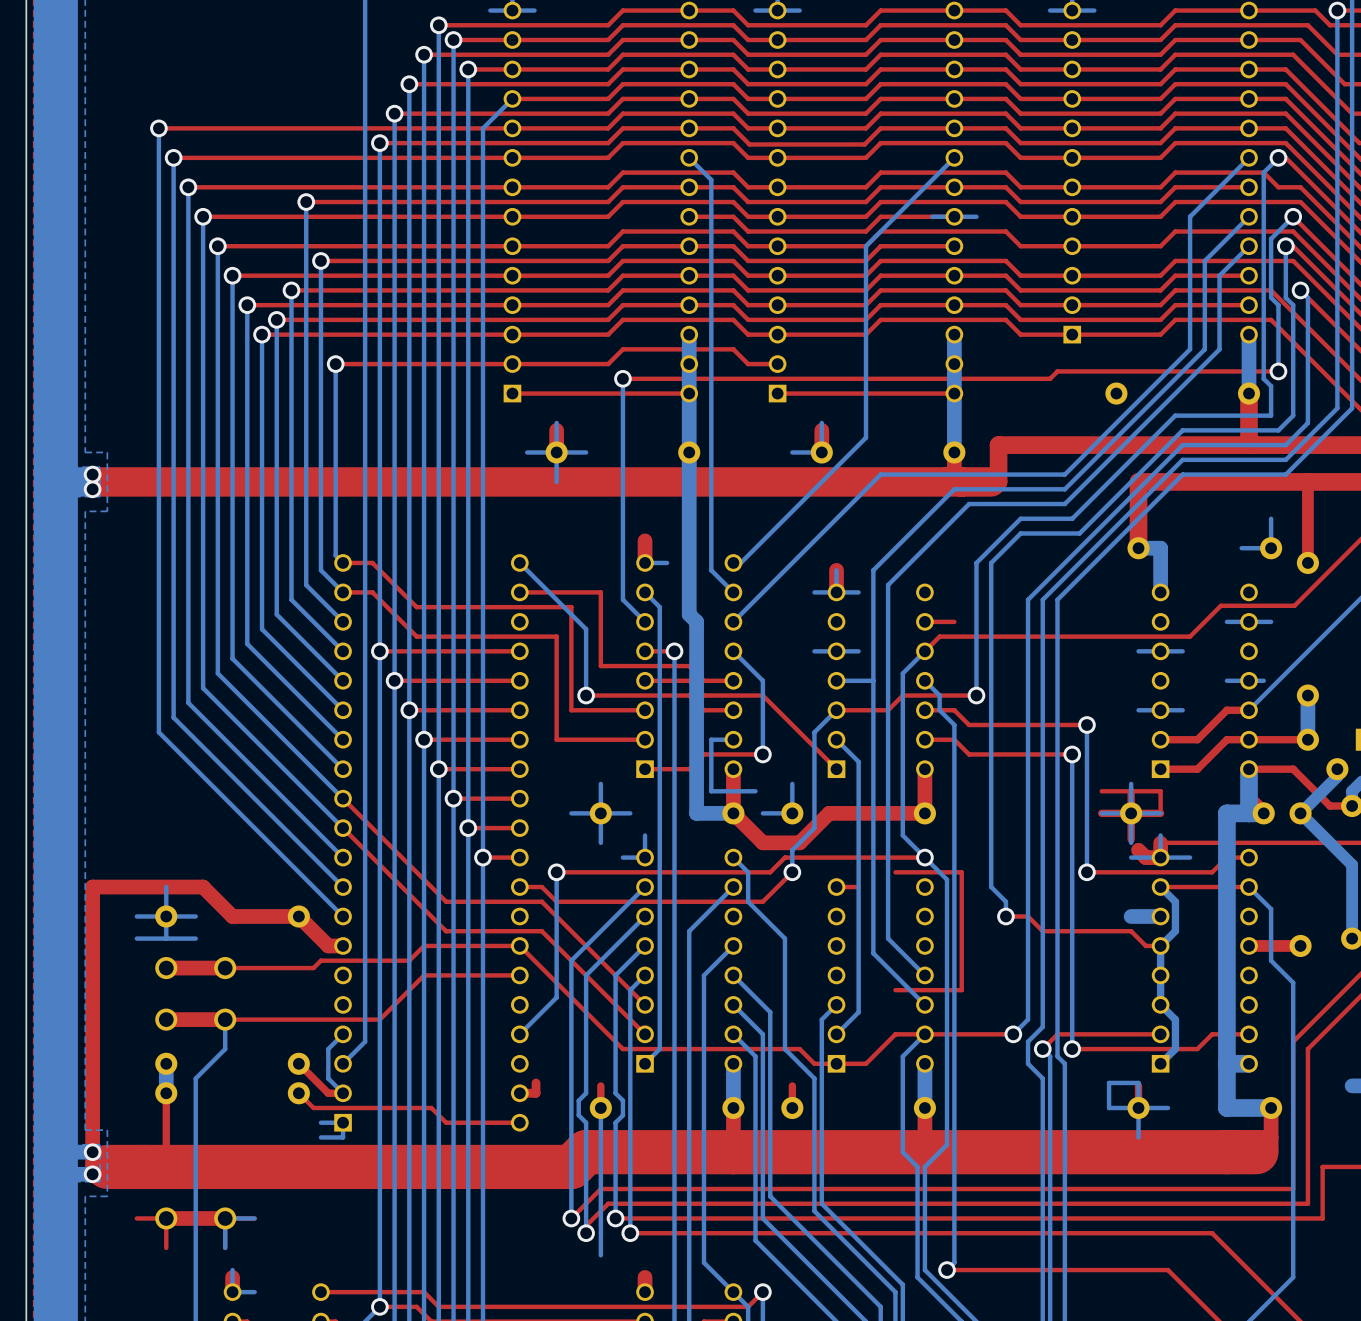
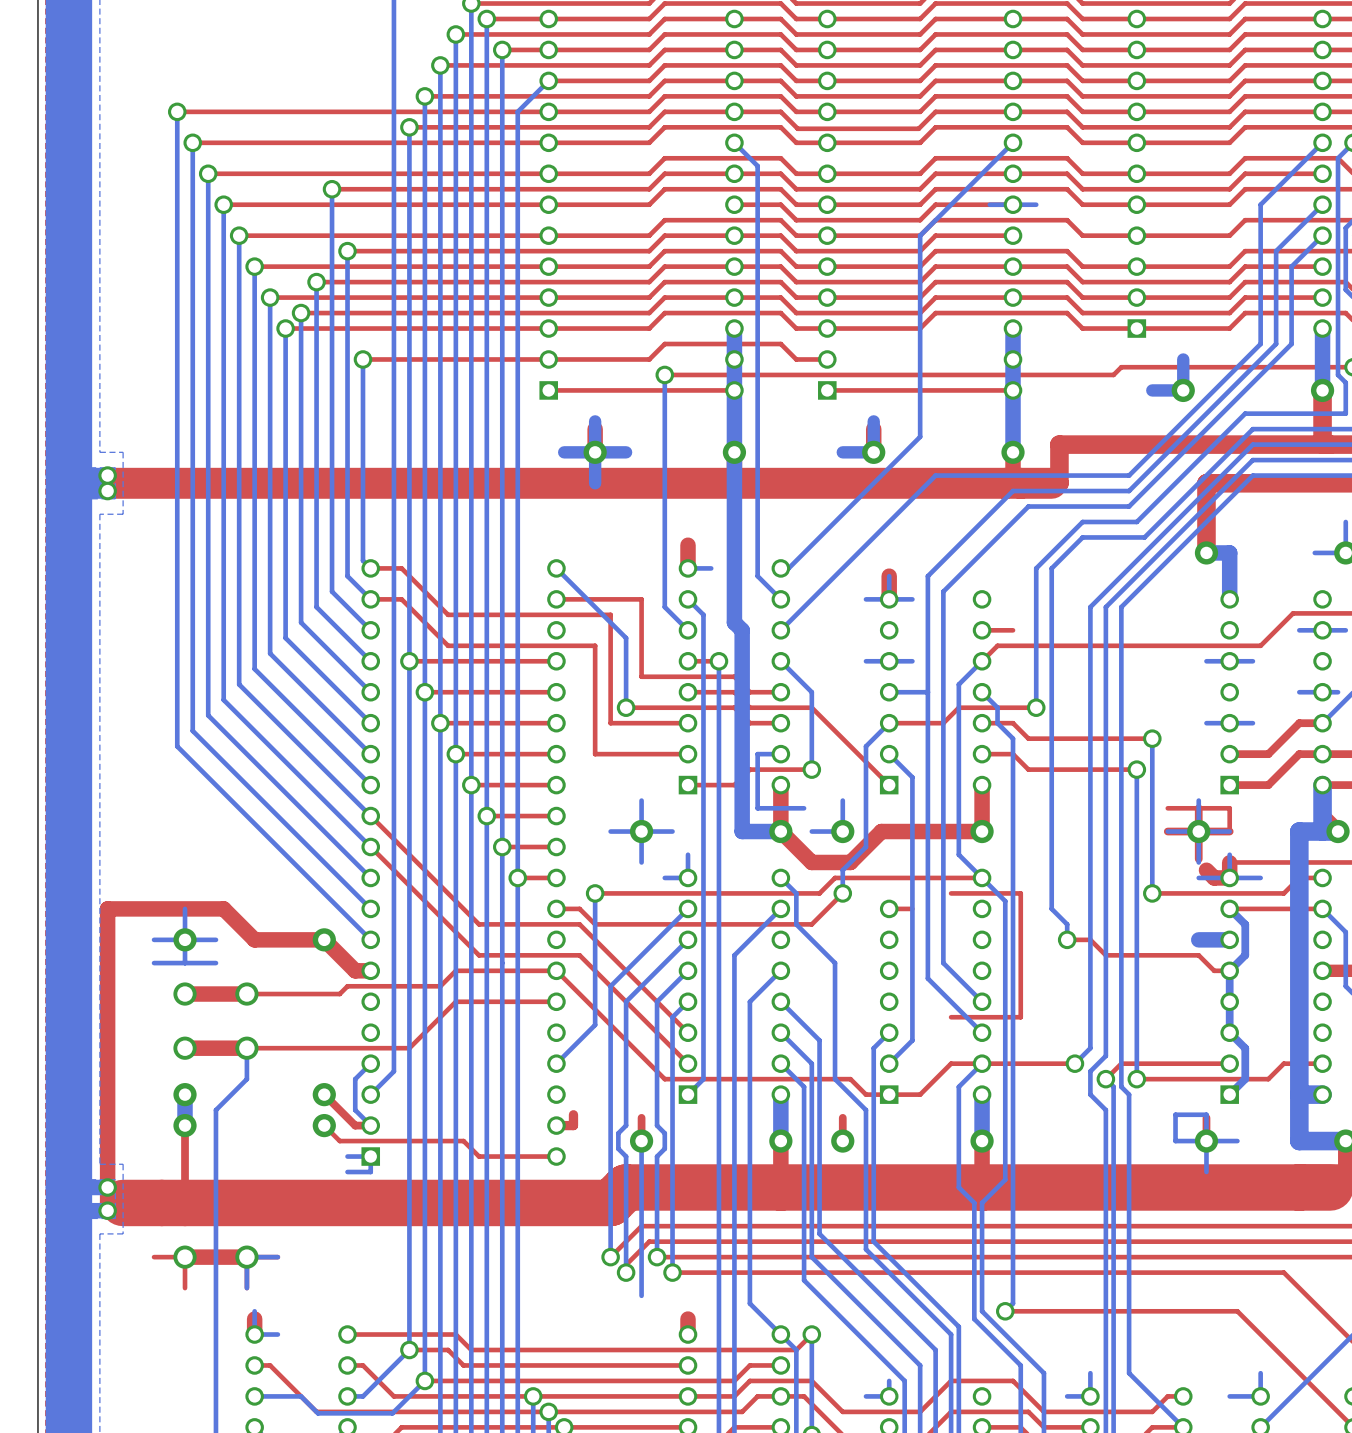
bottom track: none -> (1183, 359) (1183, 390) (1152, 390)
bottom track width: thin (556, 423) (556, 481) -> thick (595, 421) (595, 483)
bottom track width: thin (821, 423) (821, 452) (792, 452) -> thick (873, 421) (873, 452) (842, 452)
bottom track width: thin (586, 452) (527, 452) -> thick (626, 452) (564, 452)

